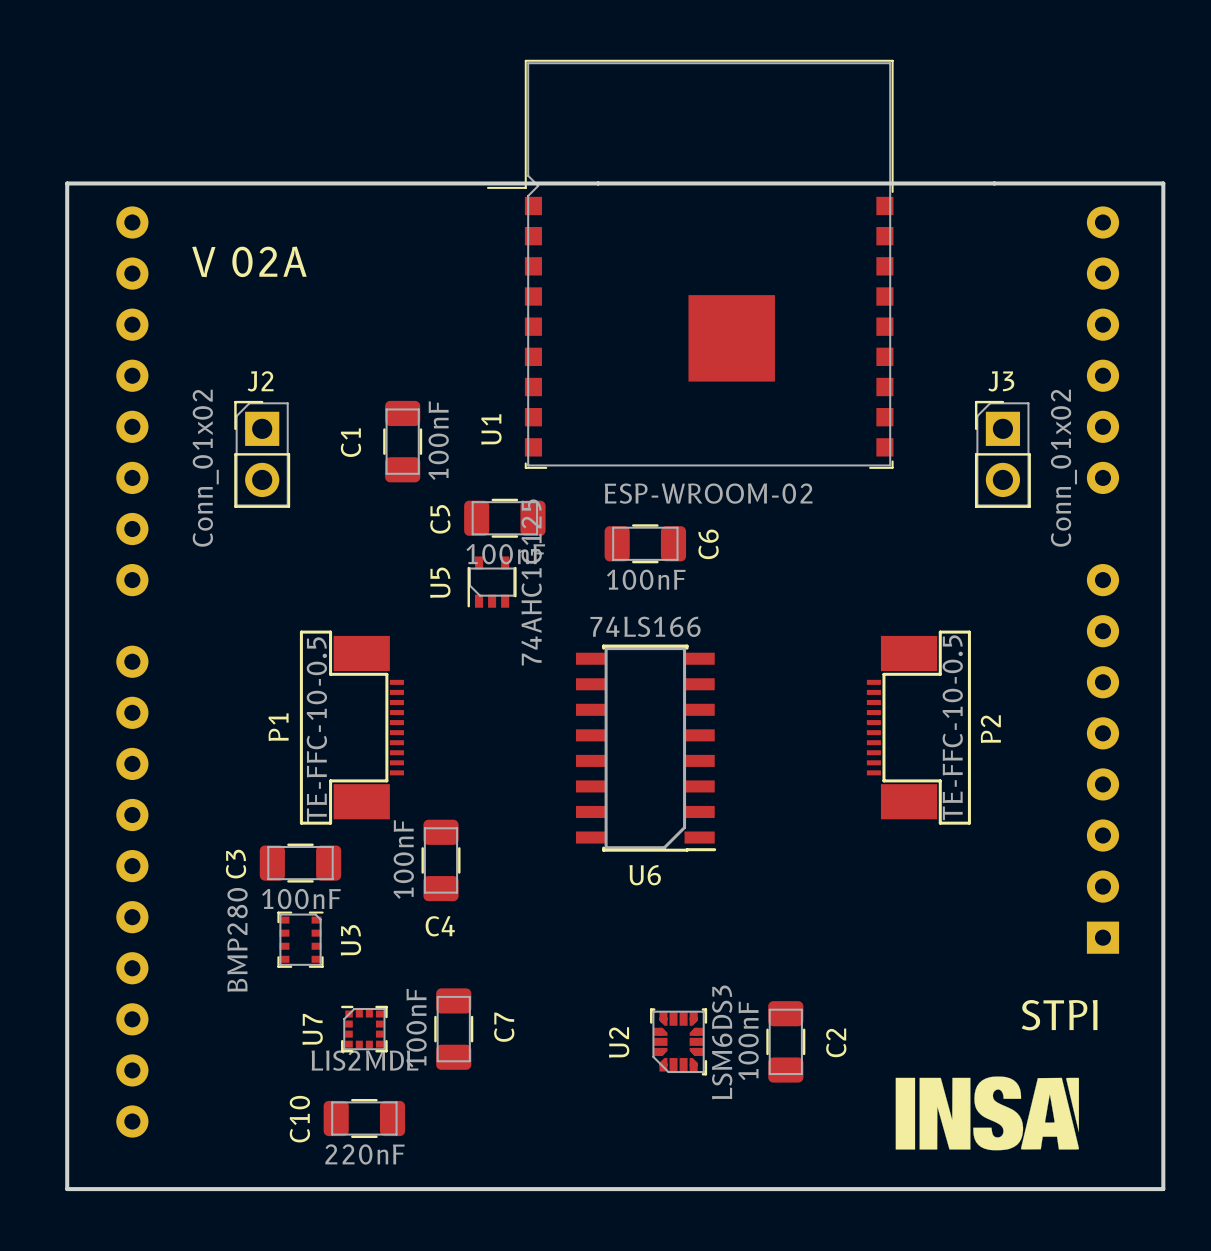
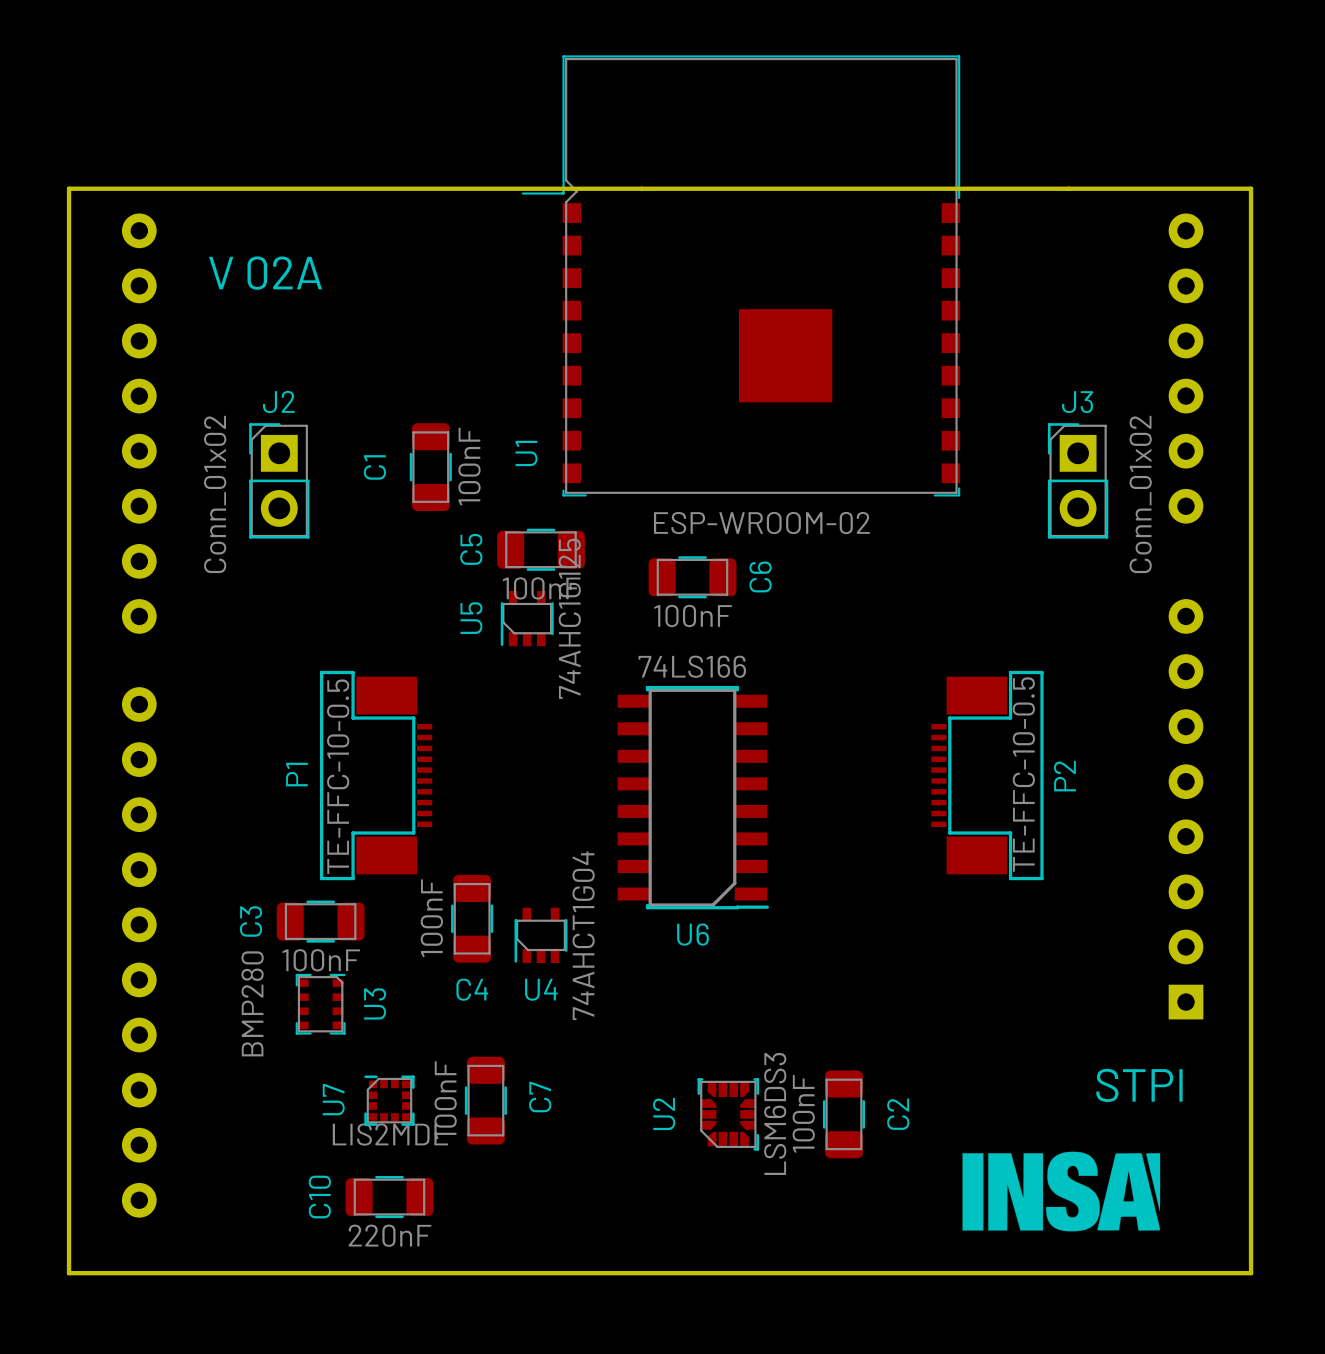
U4: none -> 74AHCT1G04 (540, 935)

